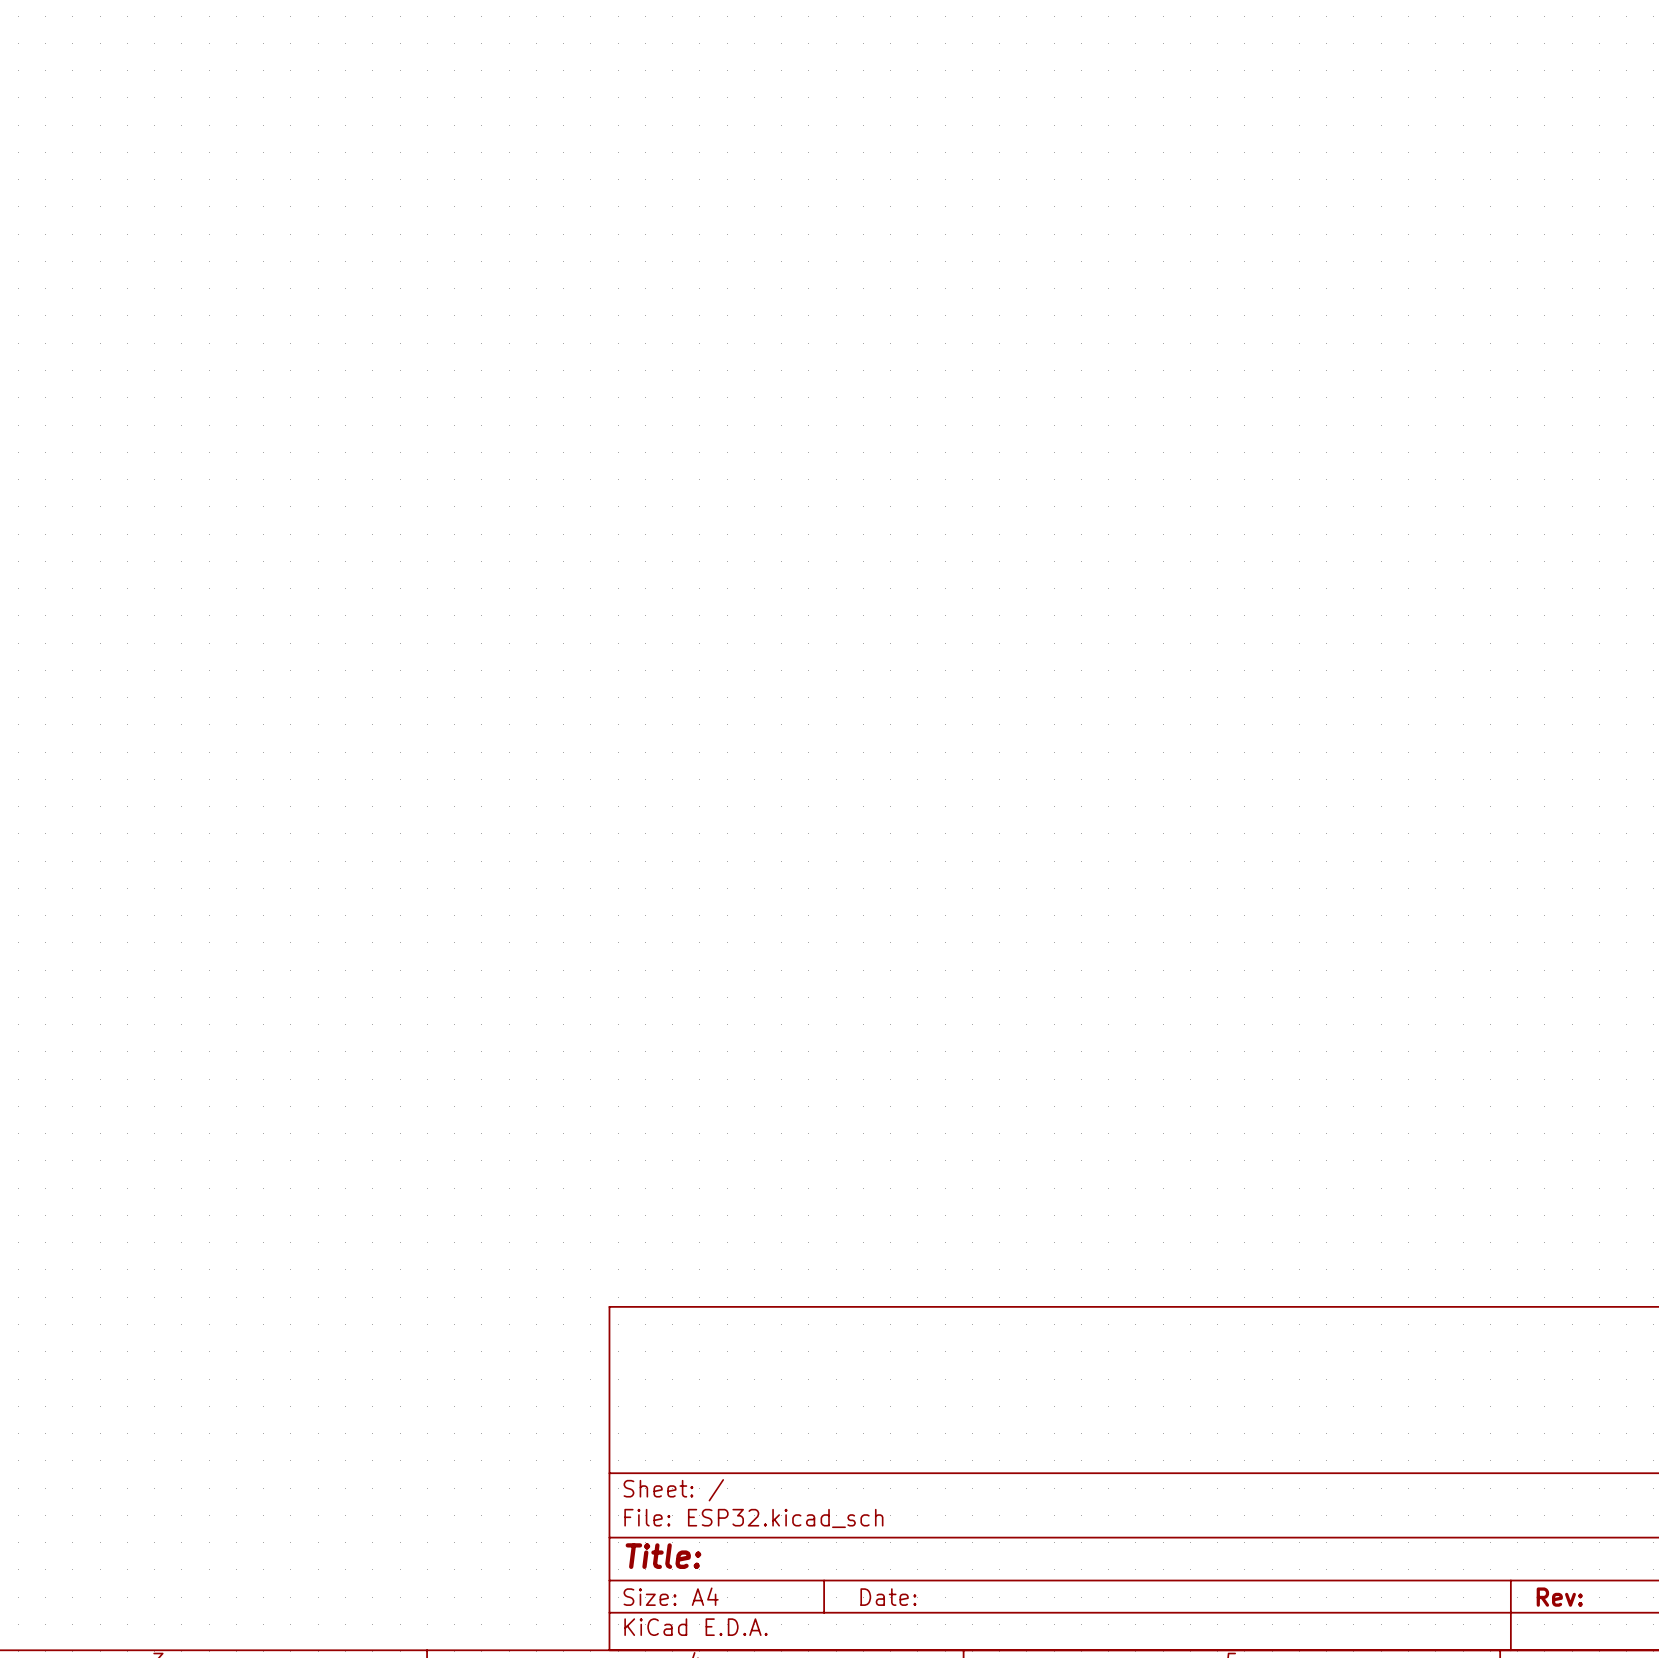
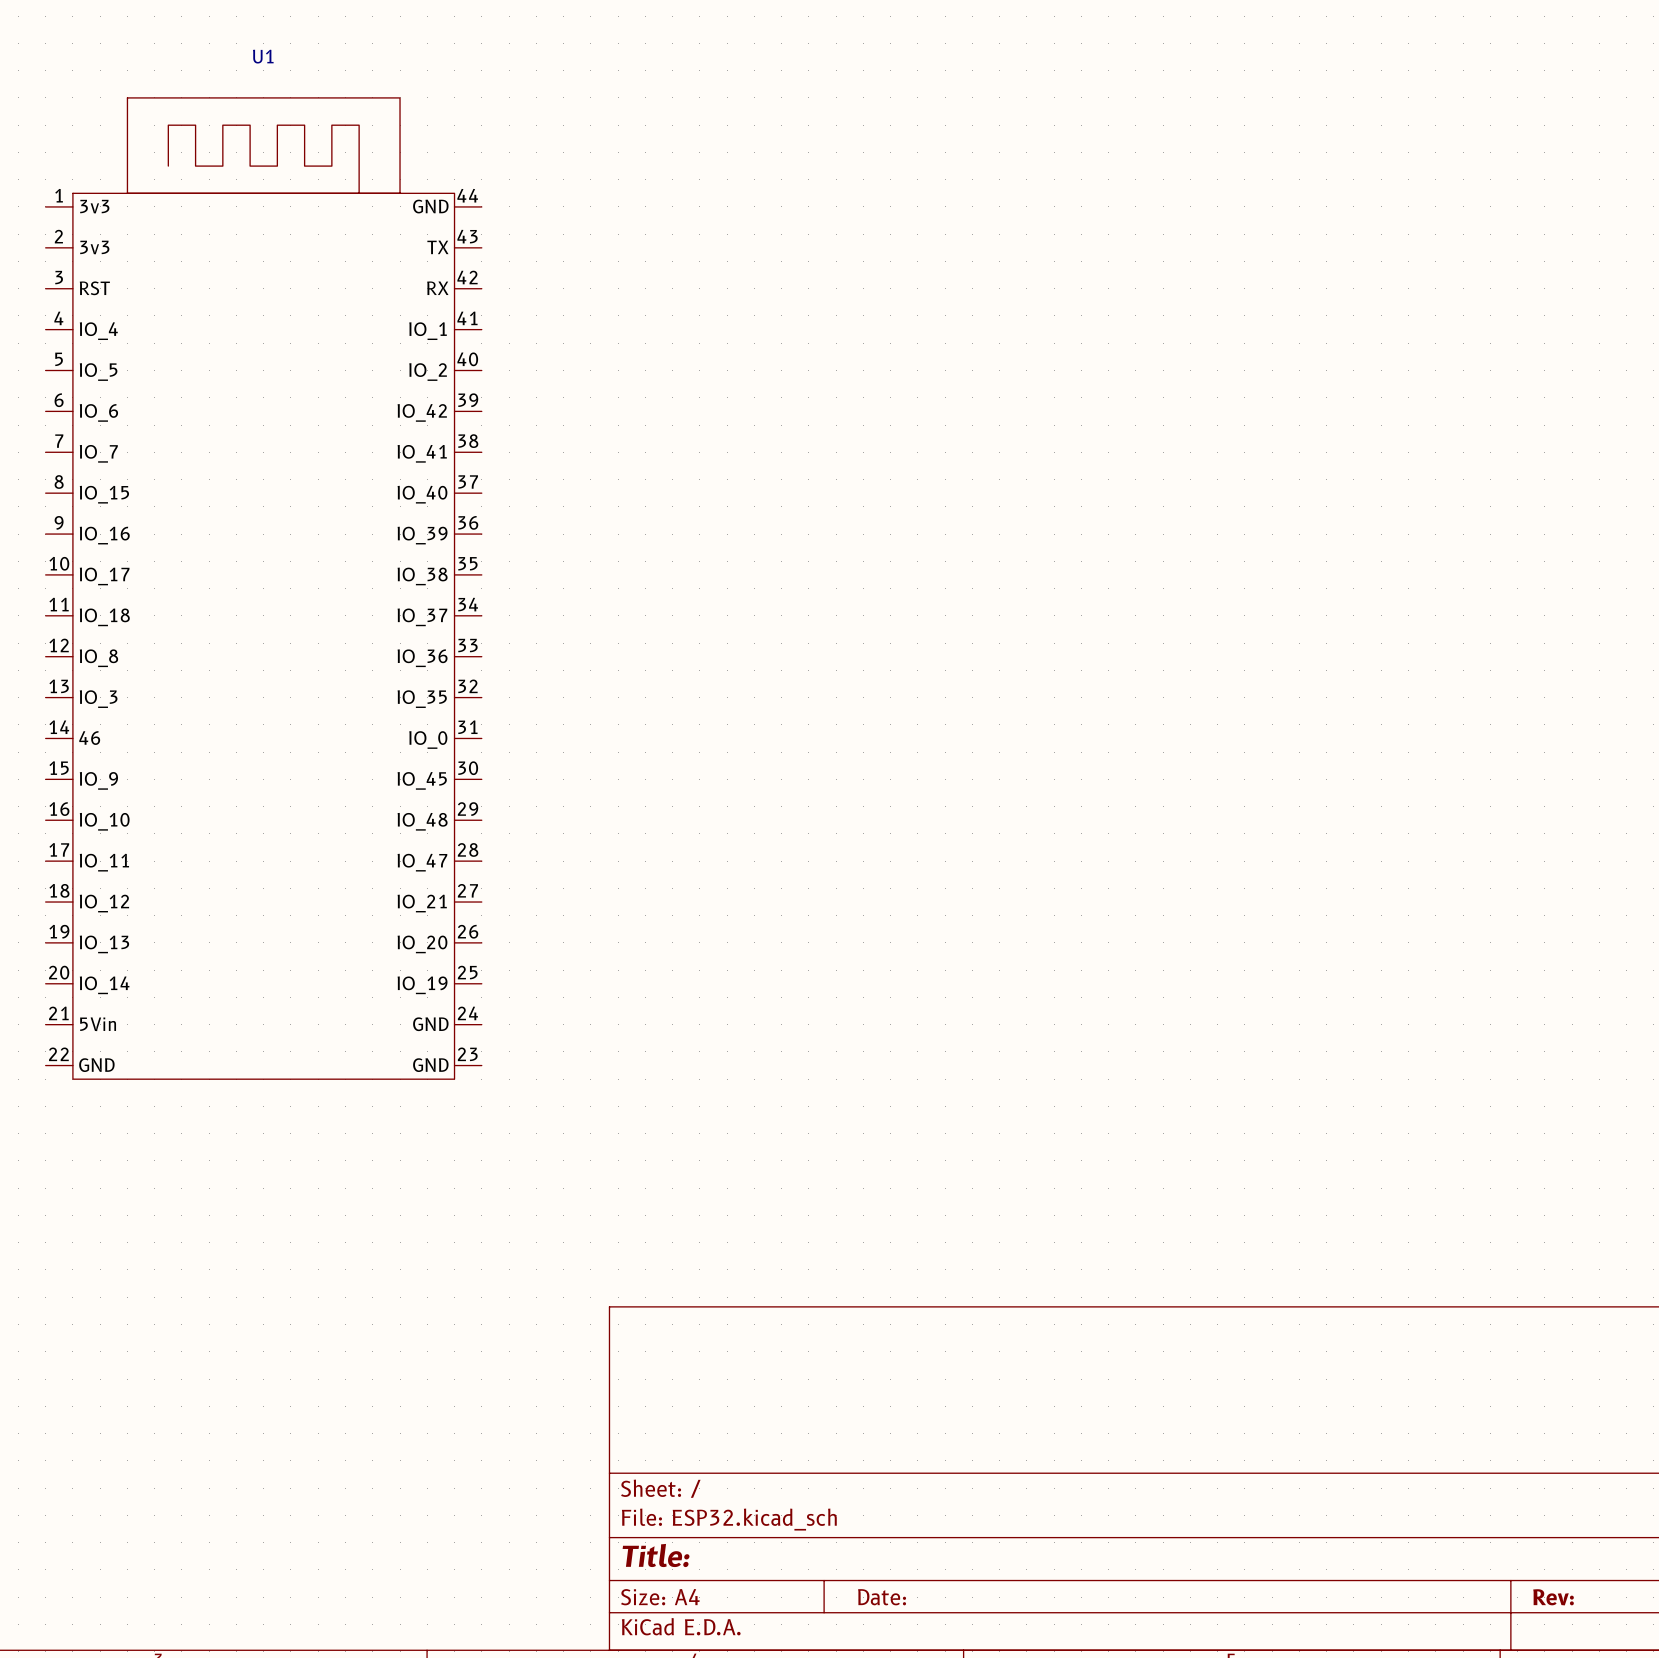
U1: none -> (263, 588)

